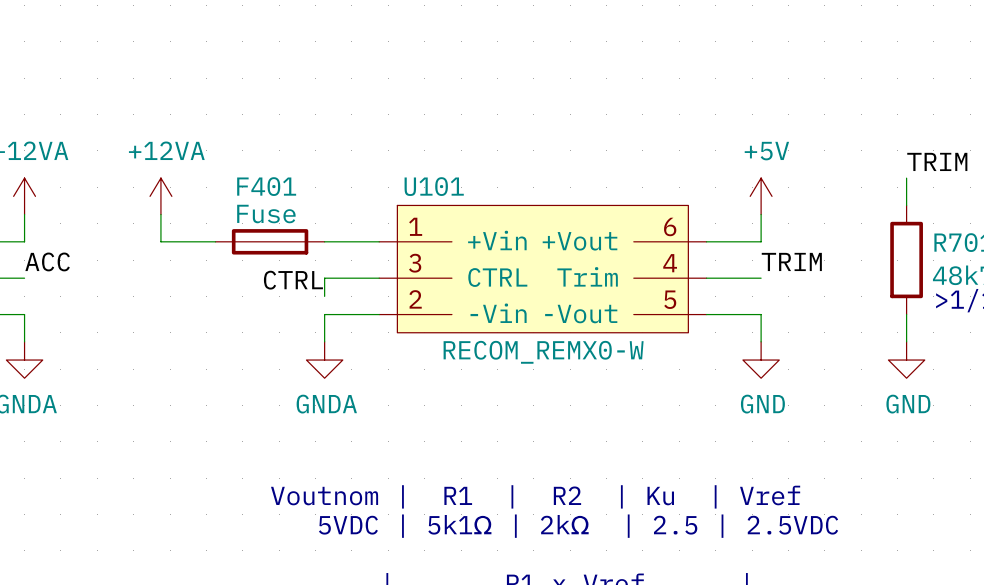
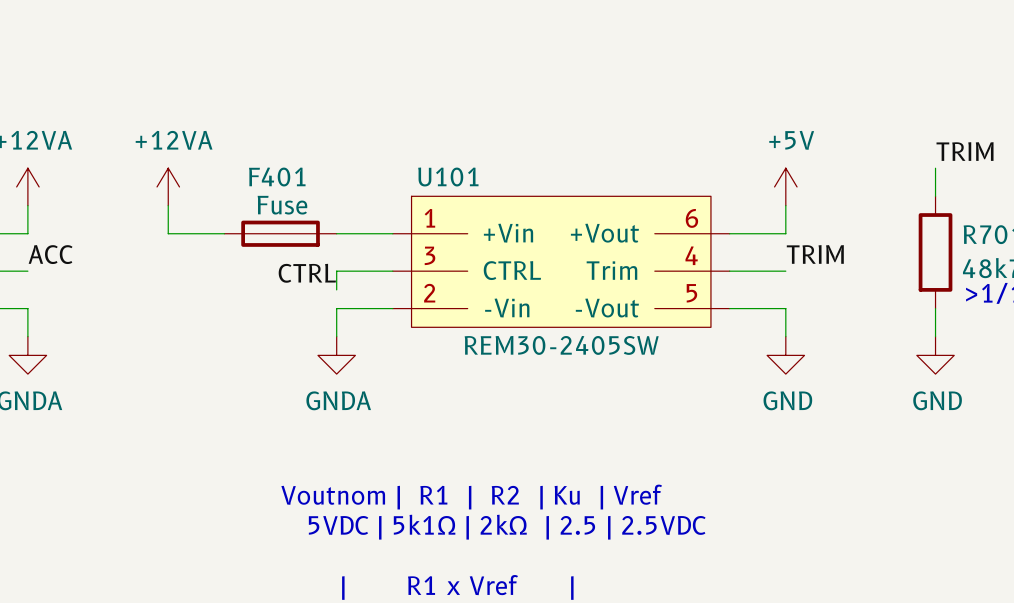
U101 value: RECOM_REMX0-W (543, 352) -> REM30-2405SW (561, 345)

